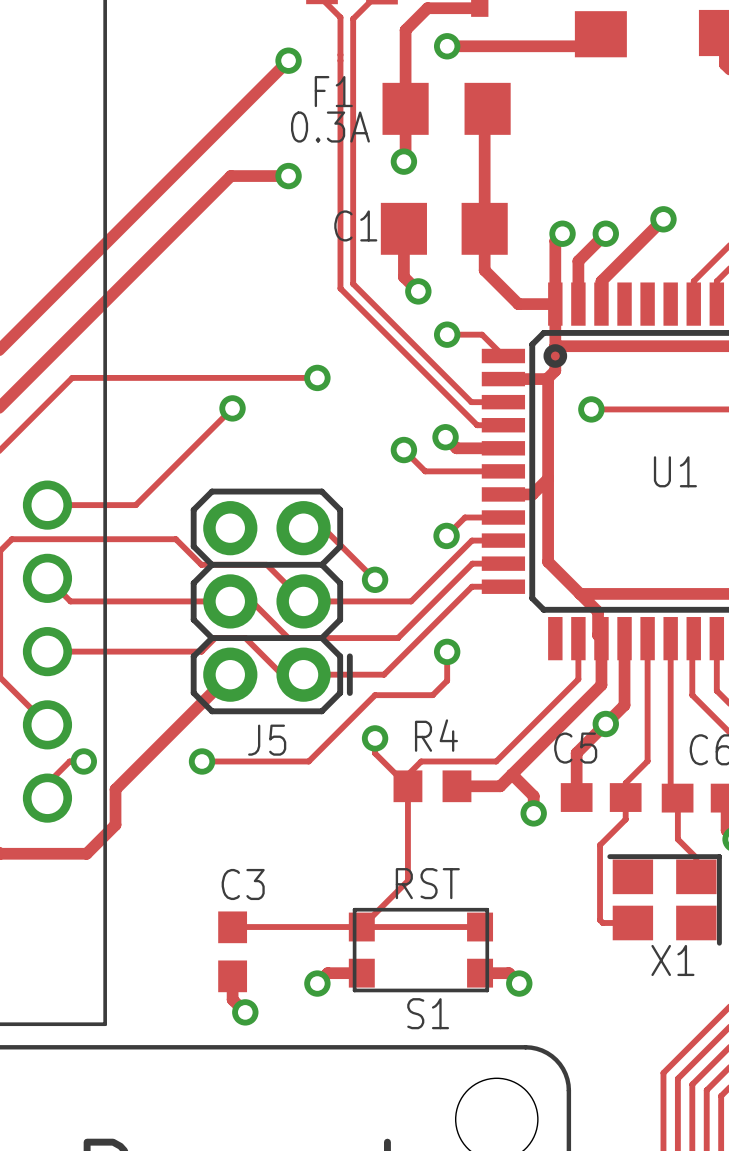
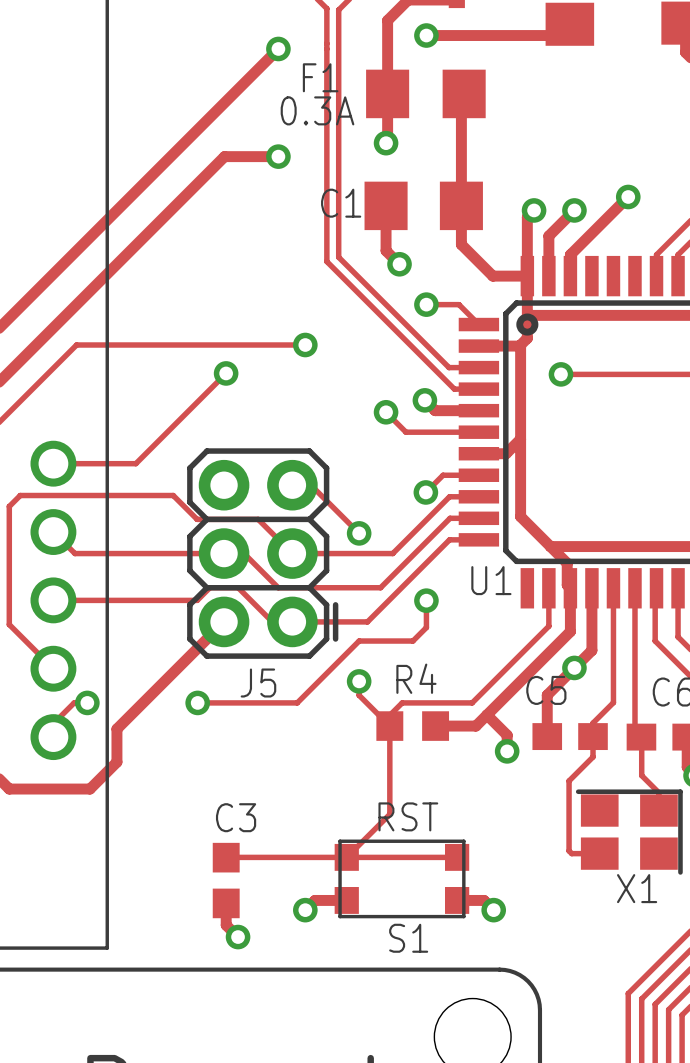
U1 name position: U1 (675, 471) -> U1 (491, 580)

